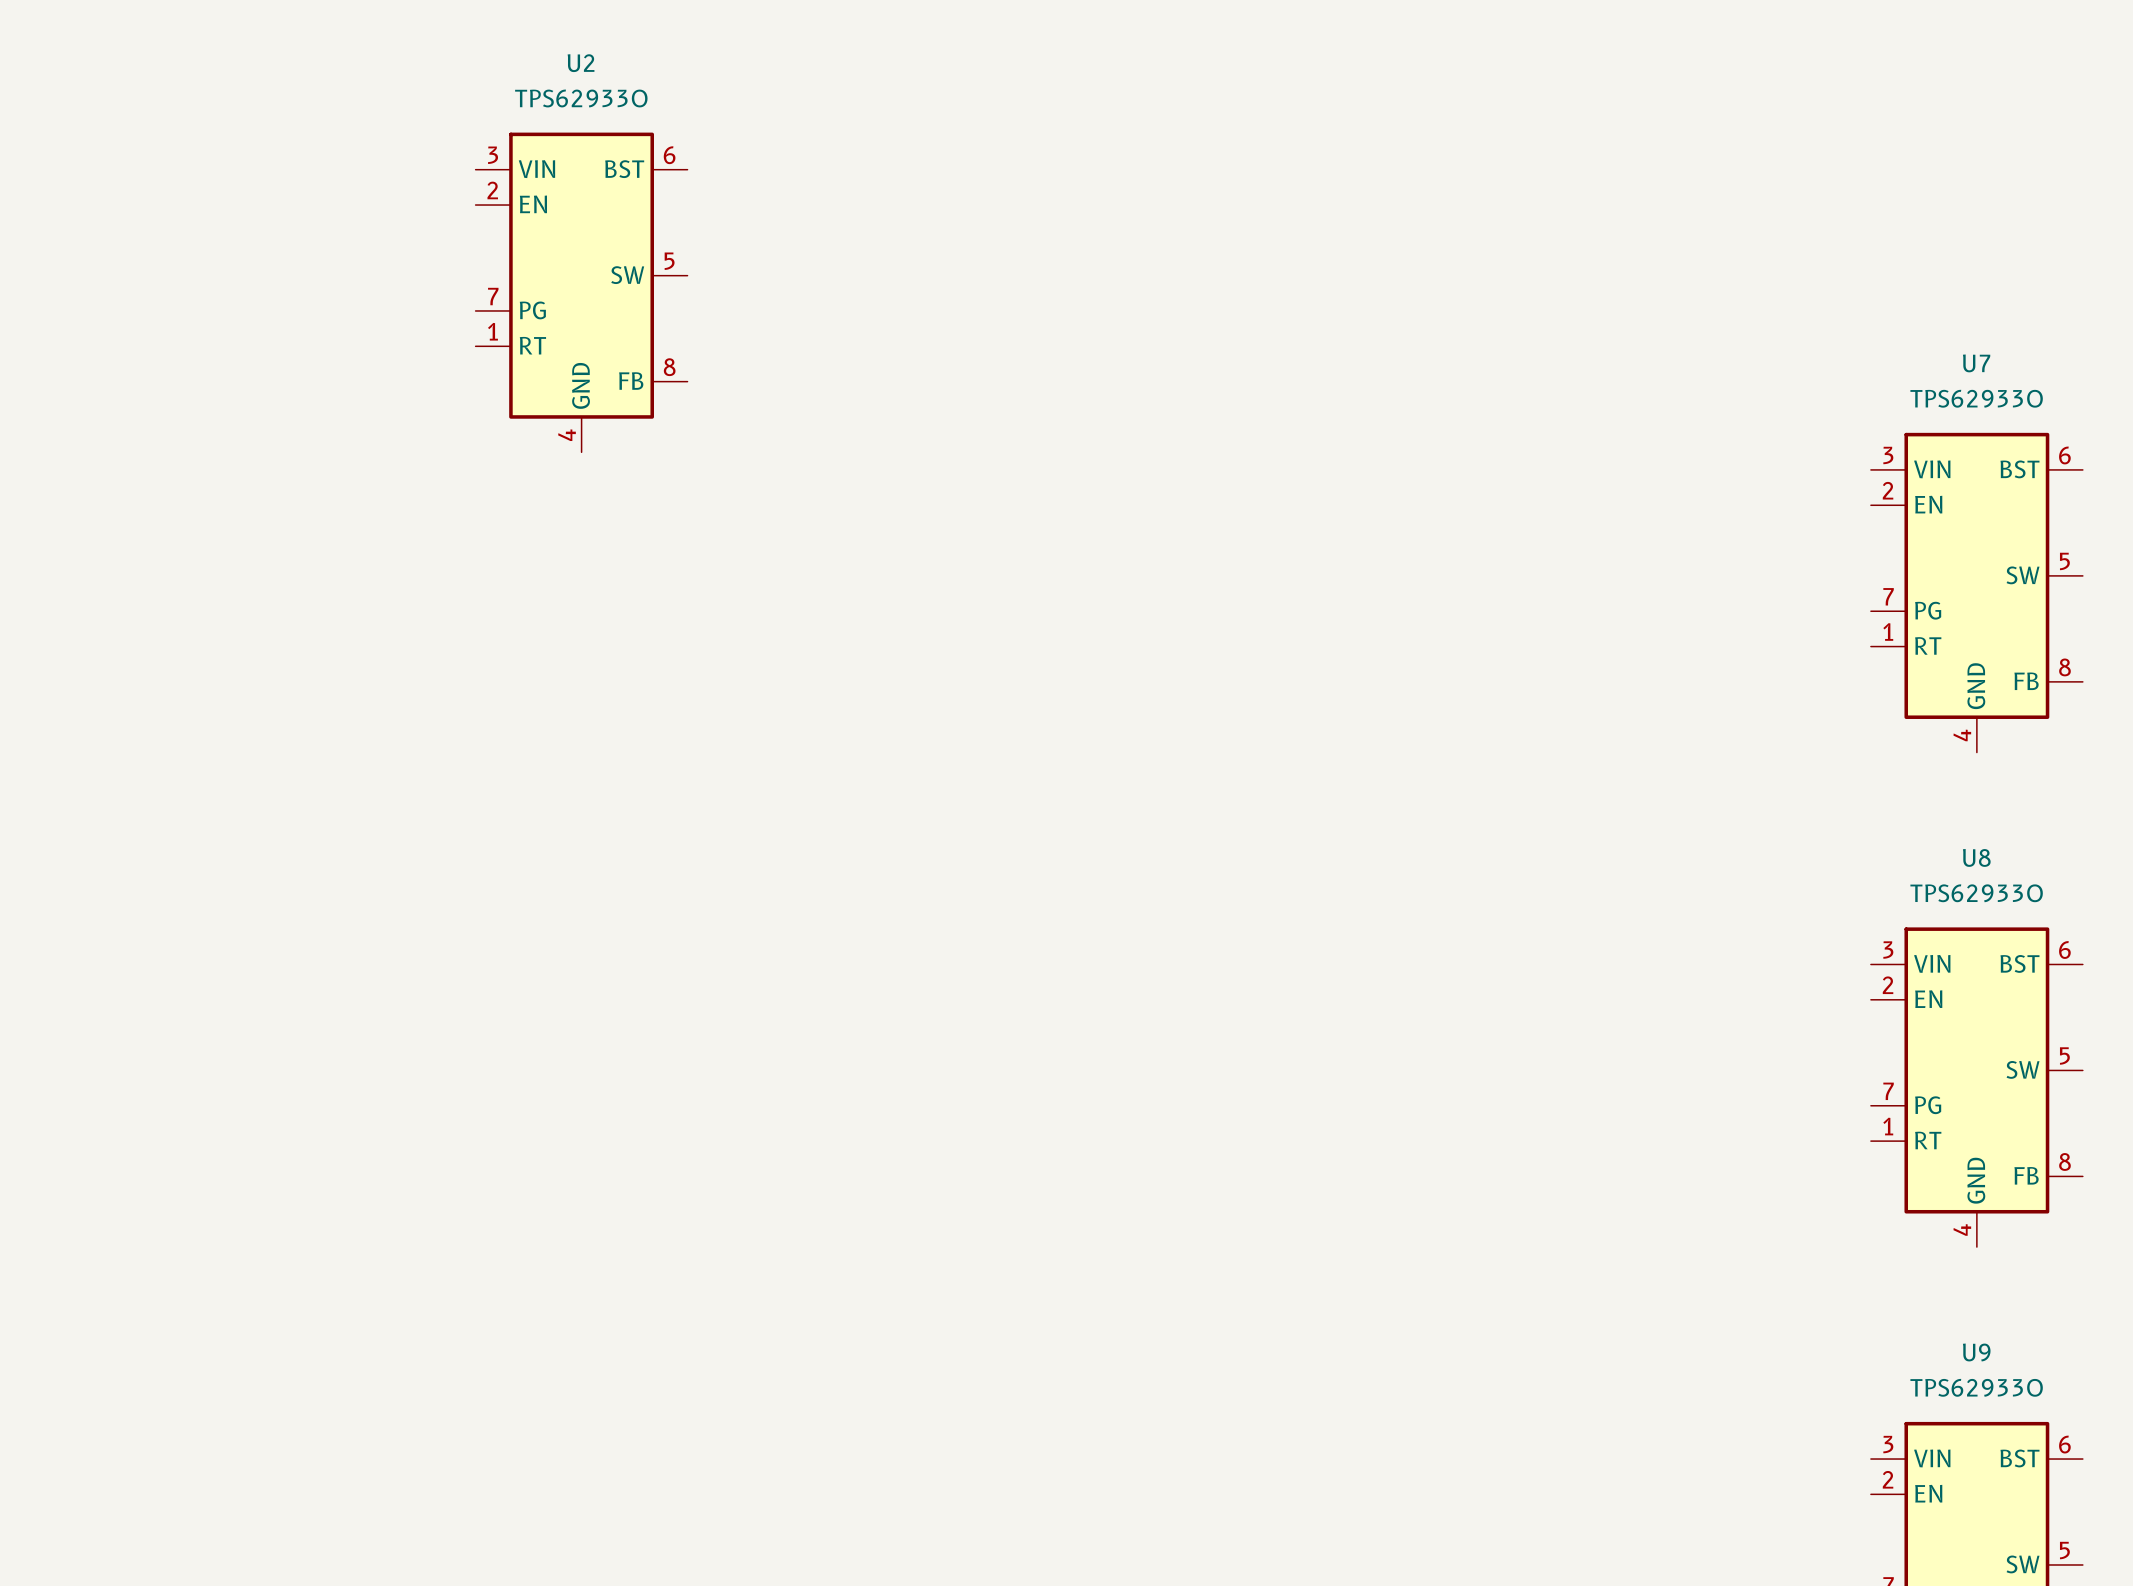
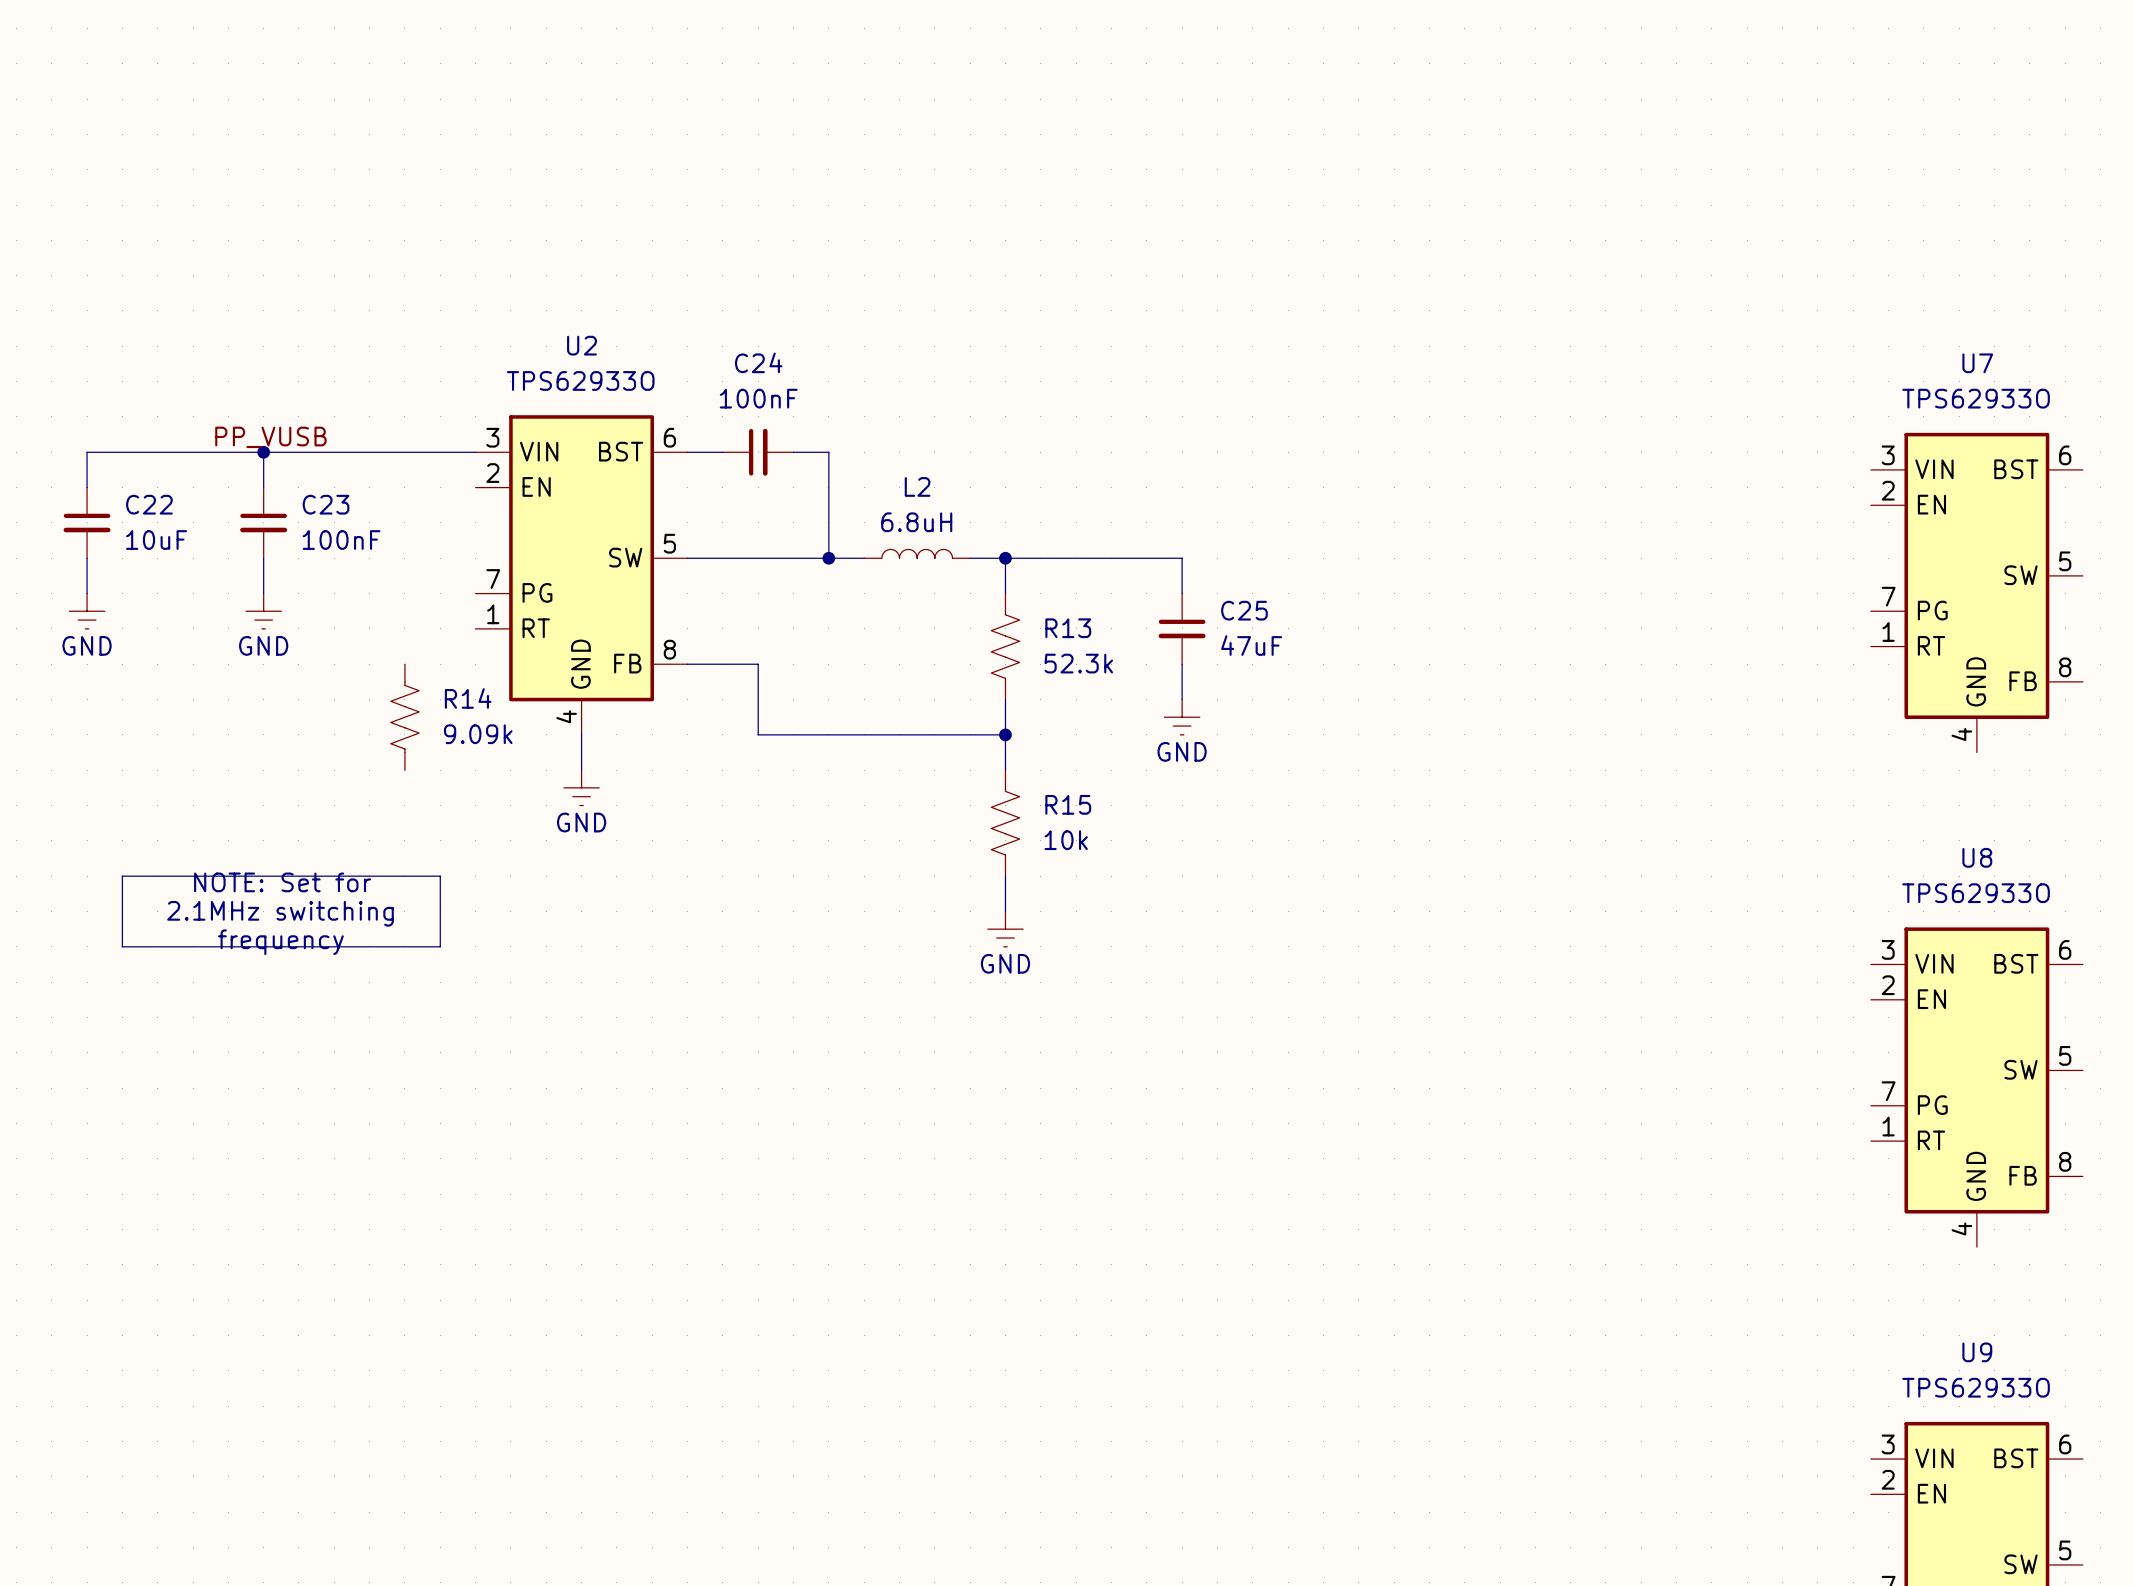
U2 position: (581, 292) -> (581, 575)
label: none -> PP_VUSB (270, 437)
wire: none -> (263, 452) (263, 487)
junction: none -> (263, 452)
wire: none -> (475, 452) (87, 452) (87, 487)
wire: none -> (687, 452) (722, 452)
C24: none -> 100nF (758, 452)
wire: none -> (793, 452) (828, 452) (828, 558)
C22: none -> 10uF (87, 522)
C23: none -> 100nF (263, 522)
L2: none -> 6.8uH (917, 553)
wire: none -> (87, 558) (87, 593)
wire: none -> (263, 558) (263, 593)
wire: none -> (687, 558) (864, 558)
junction: none -> (828, 558)
wire: none -> (970, 558) (1182, 558) (1182, 593)
wire: none -> (1005, 558) (1005, 593)
junction: none -> (1005, 558)
power symbol: none -> GND (87, 611)
power symbol: none -> GND (263, 611)
C25: none -> 47uF (1182, 628)
R13: none -> 52.3k (1005, 646)
wire: none -> (687, 664) (758, 664) (758, 734) (1005, 734)
wire: none -> (1182, 664) (1182, 699)
wire: none -> (1005, 699) (1005, 770)
R14: none -> 9.09k (404, 717)
power symbol: none -> GND (1182, 717)
wire: none -> (581, 734) (581, 770)
junction: none -> (1005, 734)
power symbol: none -> GND (581, 787)
R15: none -> 10k (1005, 823)
line: none -> (122, 876) (440, 876) (440, 946) (122, 946) (122, 876)
wire: none -> (1005, 876) (1005, 911)
text: none -> NOTE: Set for (282, 882)
text: none -> 2.1MHz switching (280, 913)
power symbol: none -> GND (1005, 929)
text: none -> frequency (280, 942)

